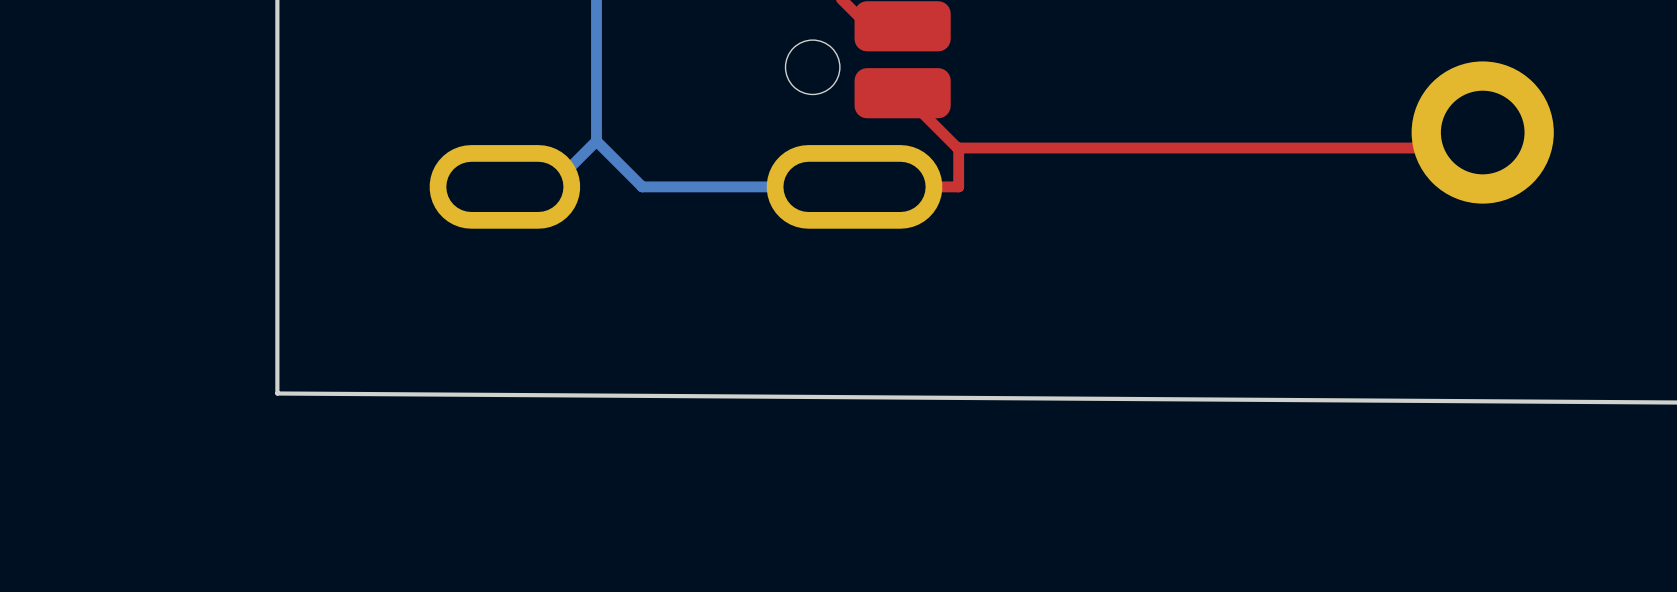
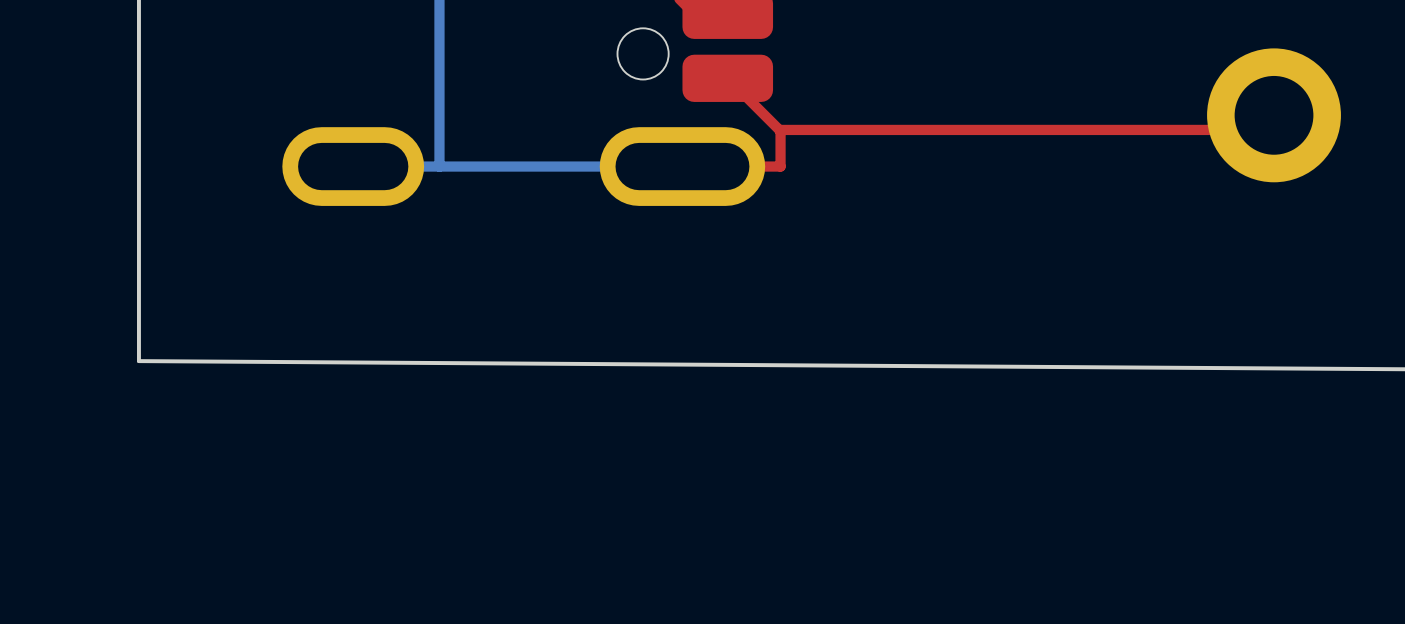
bottom track: none -> (439, 123) (439, 166)
bottom track: (642, 186) (596, 141) (550, 186) -> (482, 166) (396, 166)

